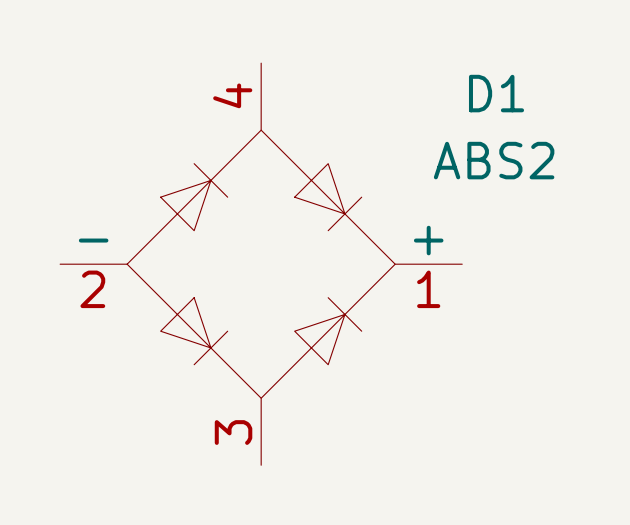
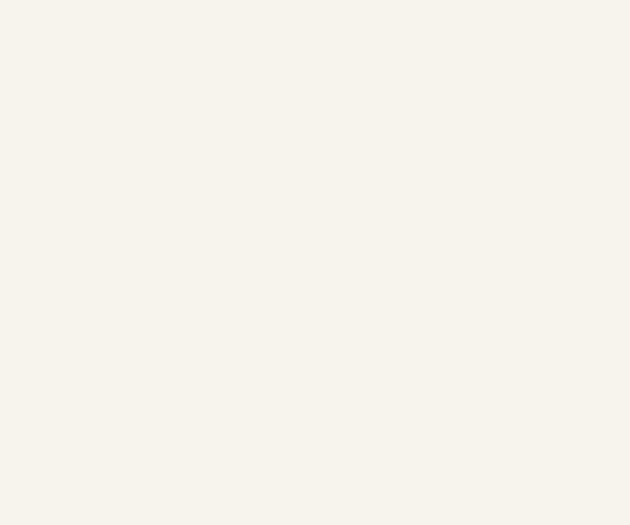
D1: ABS2 (261, 264) -> none

